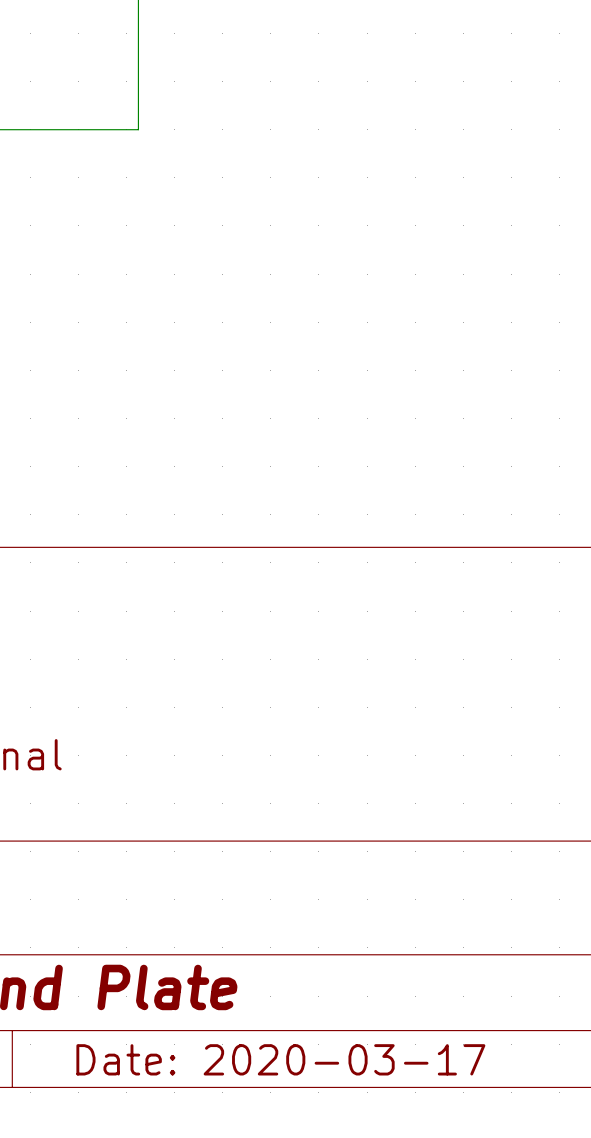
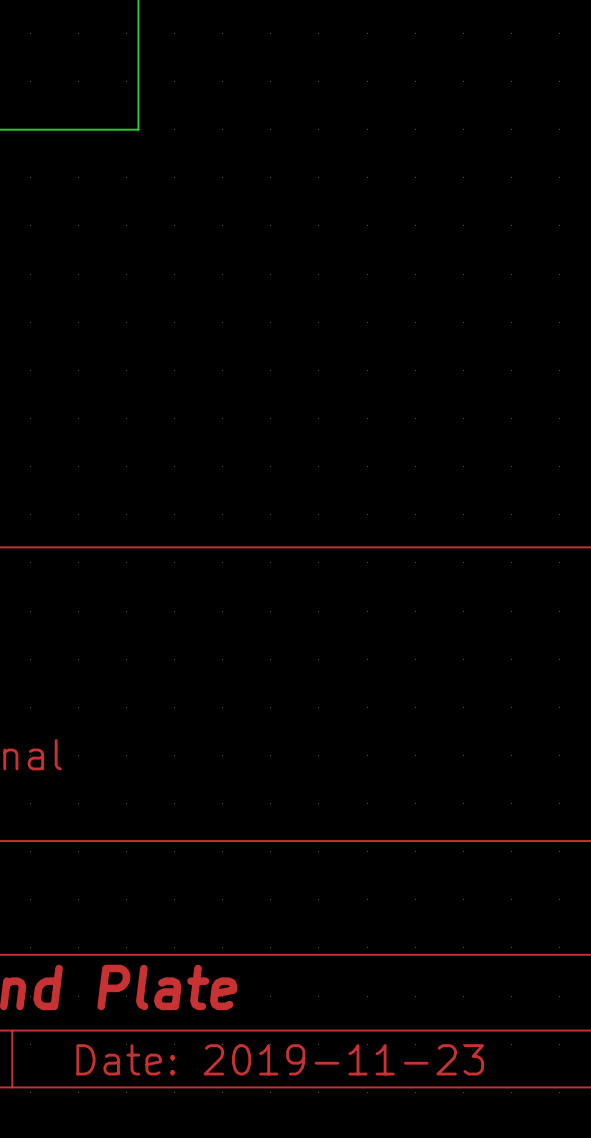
title block: Date: 2020-03-17 (280, 1059) -> Date: 2019-11-23 (280, 1059)

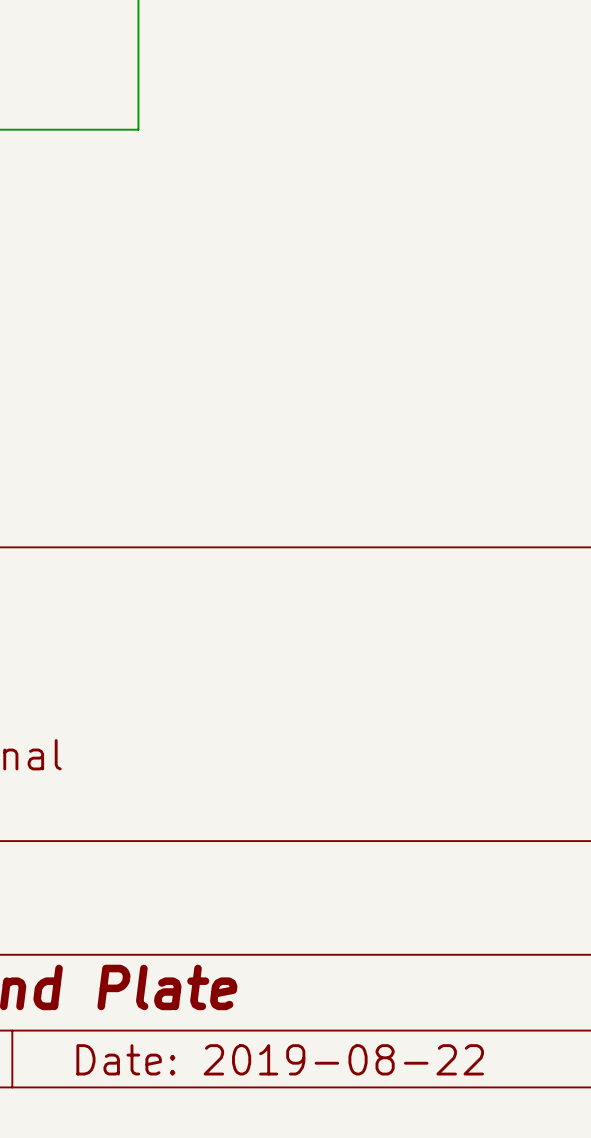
title block: Date: 2019-11-23 (280, 1059) -> Date: 2019-08-22 (280, 1059)

